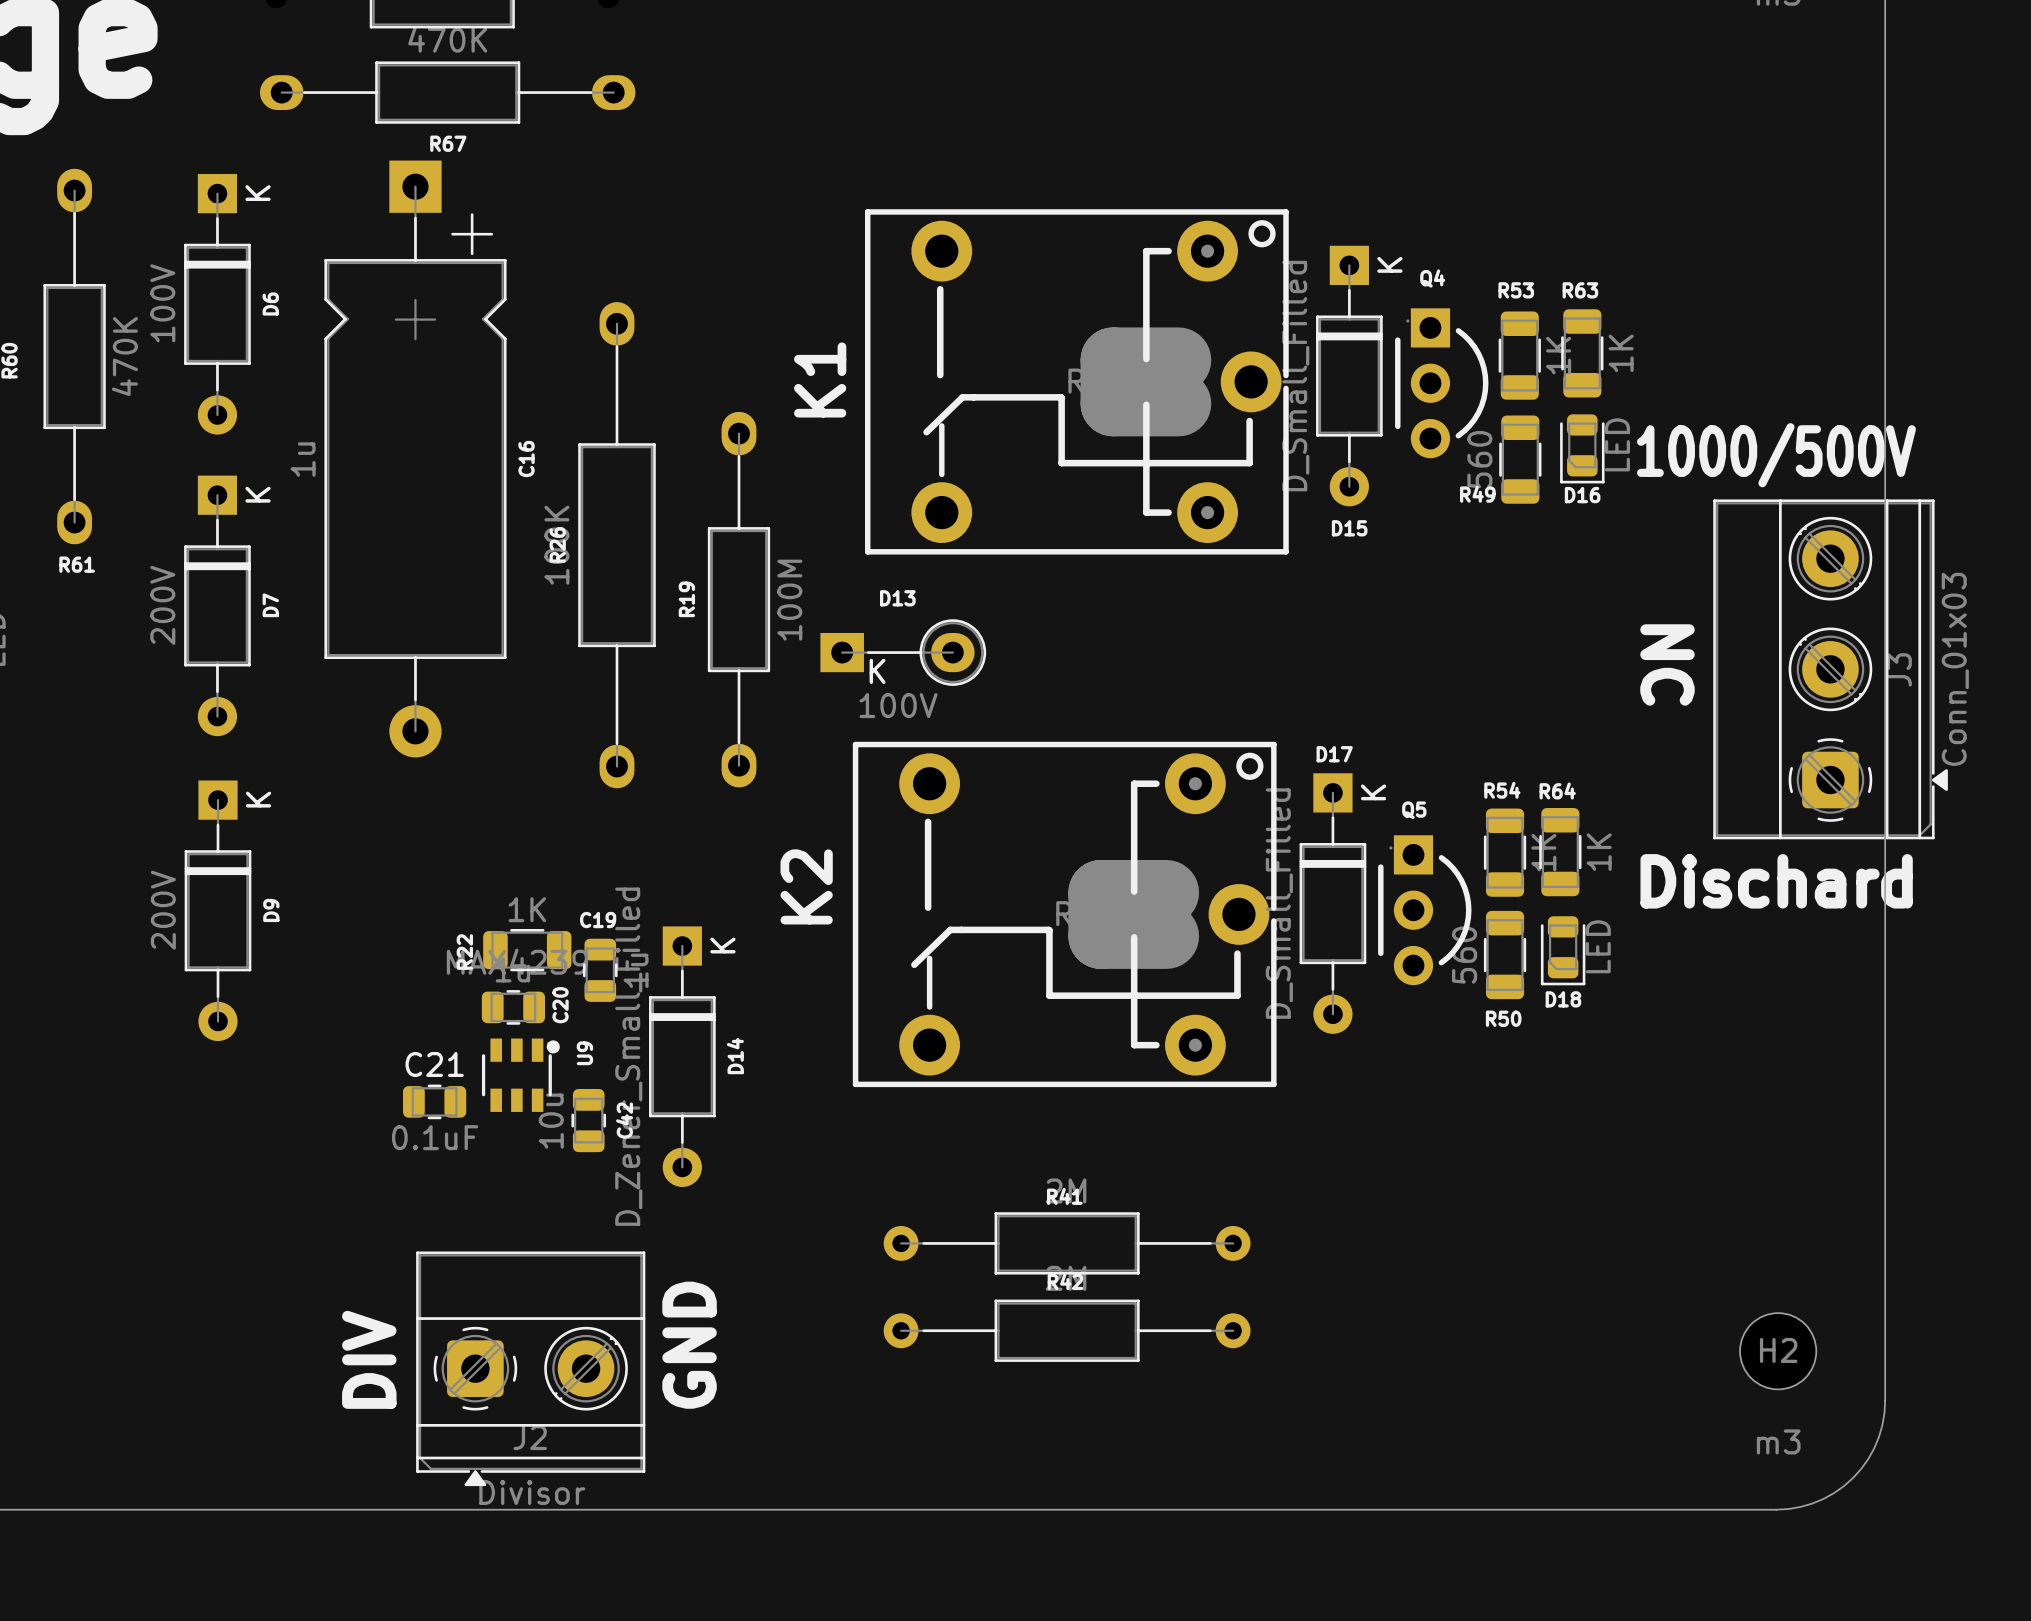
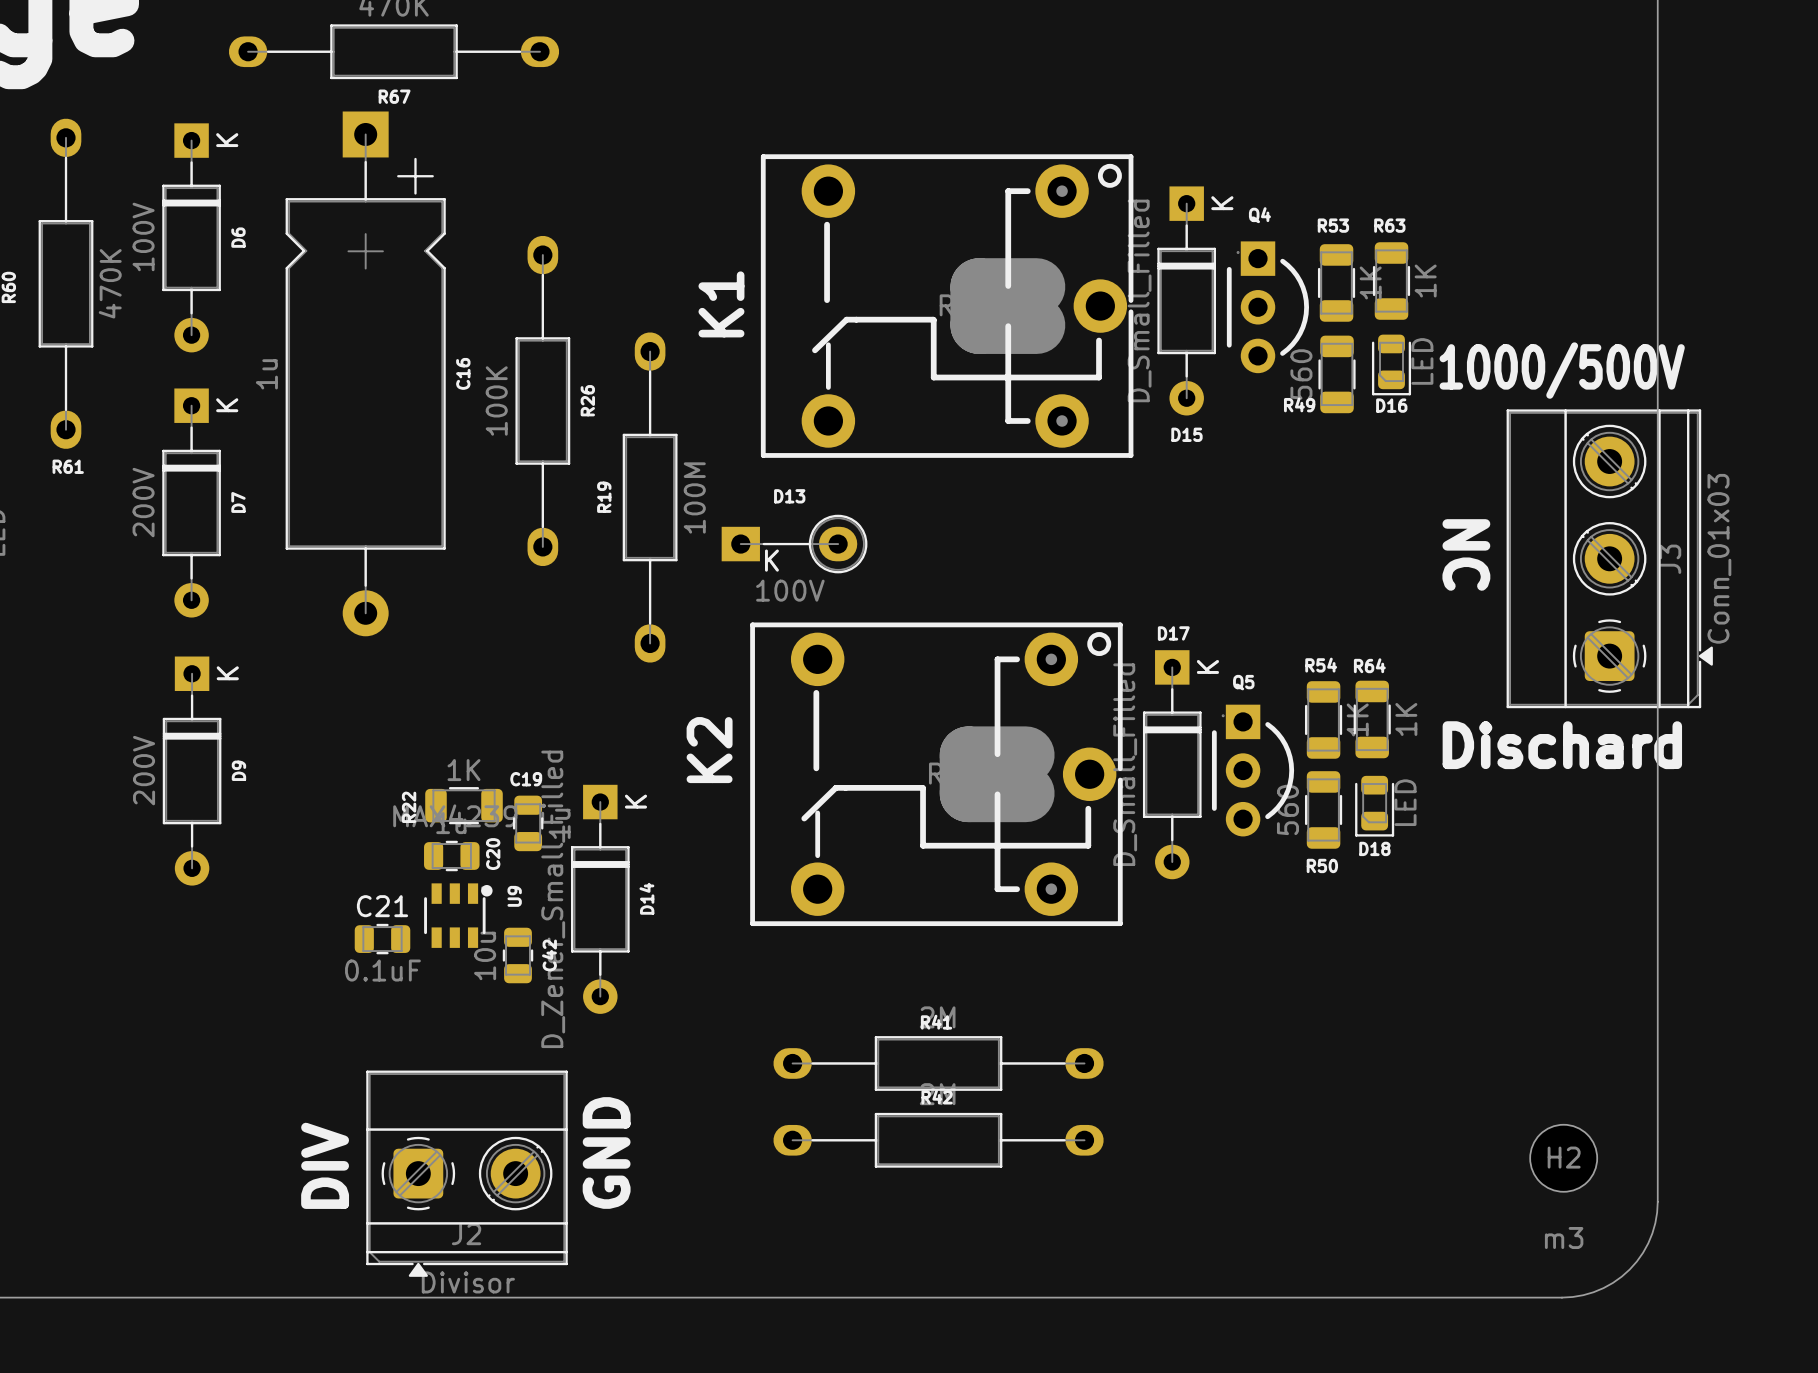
R26 footprint: [578, 302, 656, 789] -> [515, 235, 571, 567]
R26 name position: R26 (557, 544) -> R26 (587, 400)
R41 footprint: [883, 1212, 1251, 1275] -> [773, 1036, 1104, 1091]
R42 footprint: [883, 1299, 1251, 1362] -> [773, 1112, 1104, 1168]

